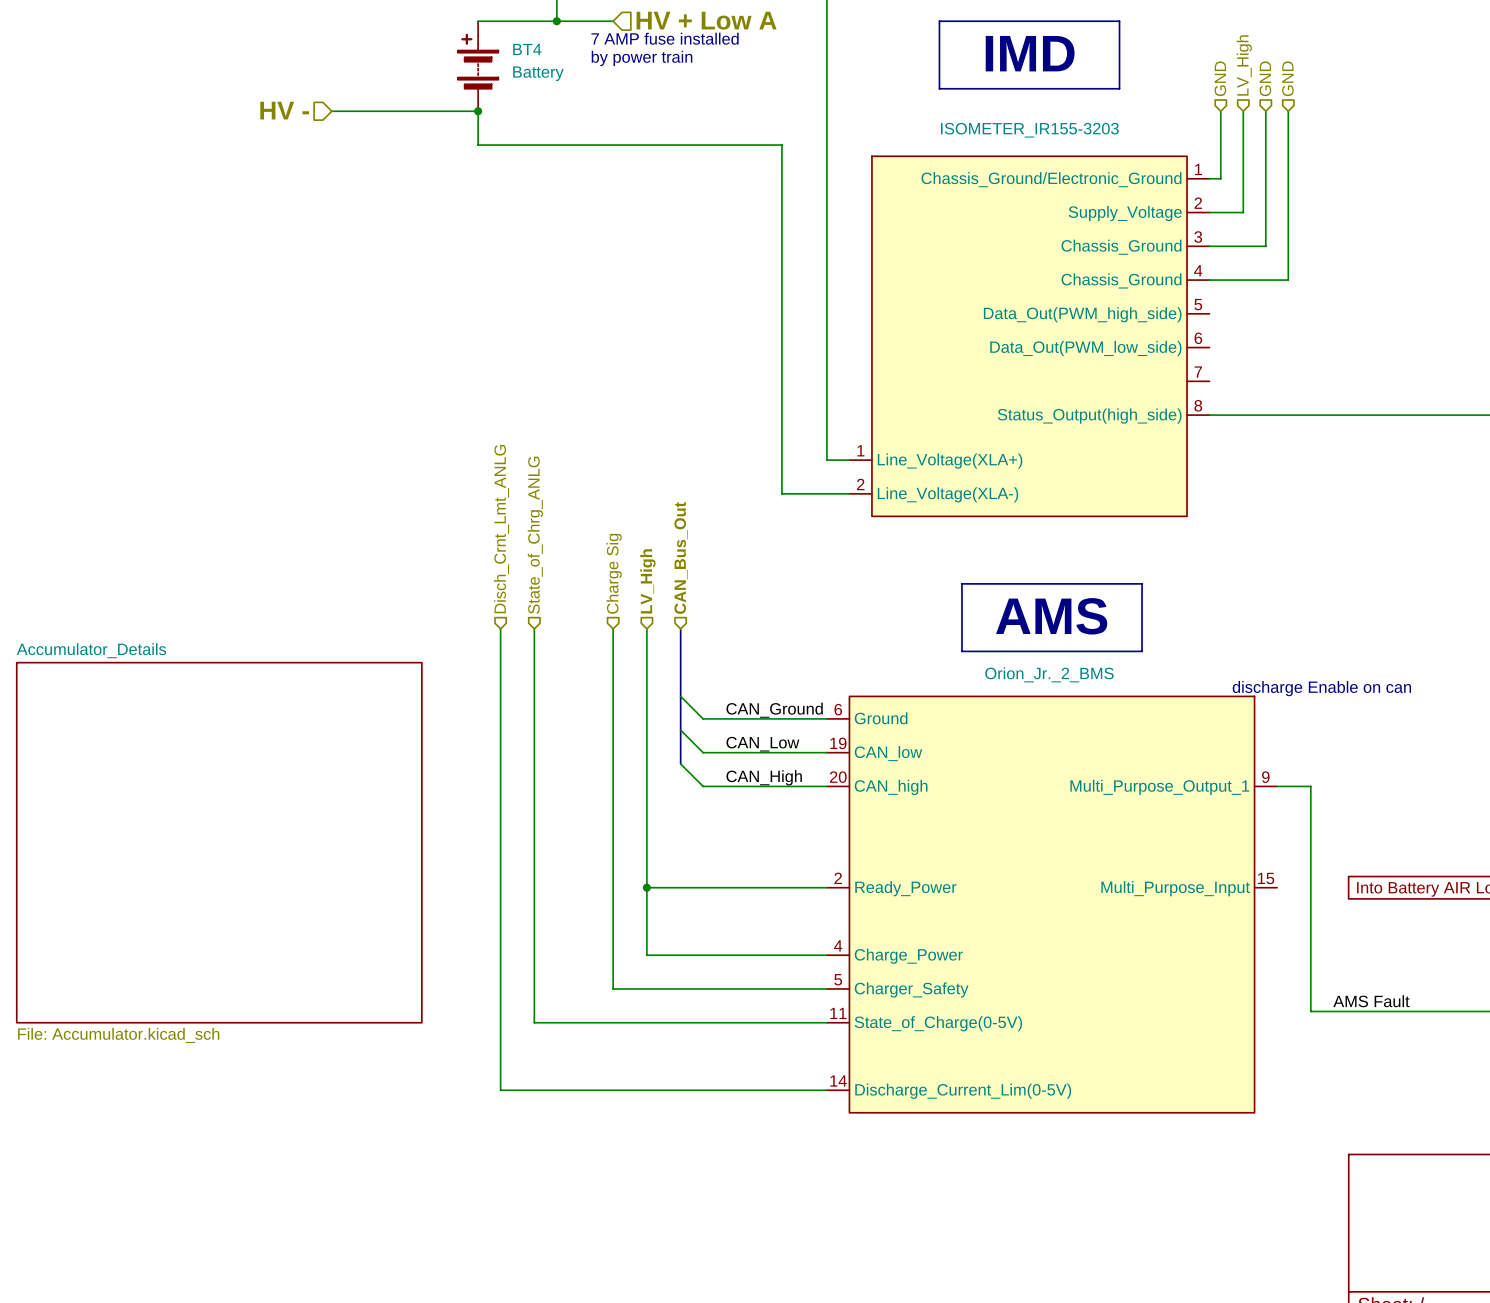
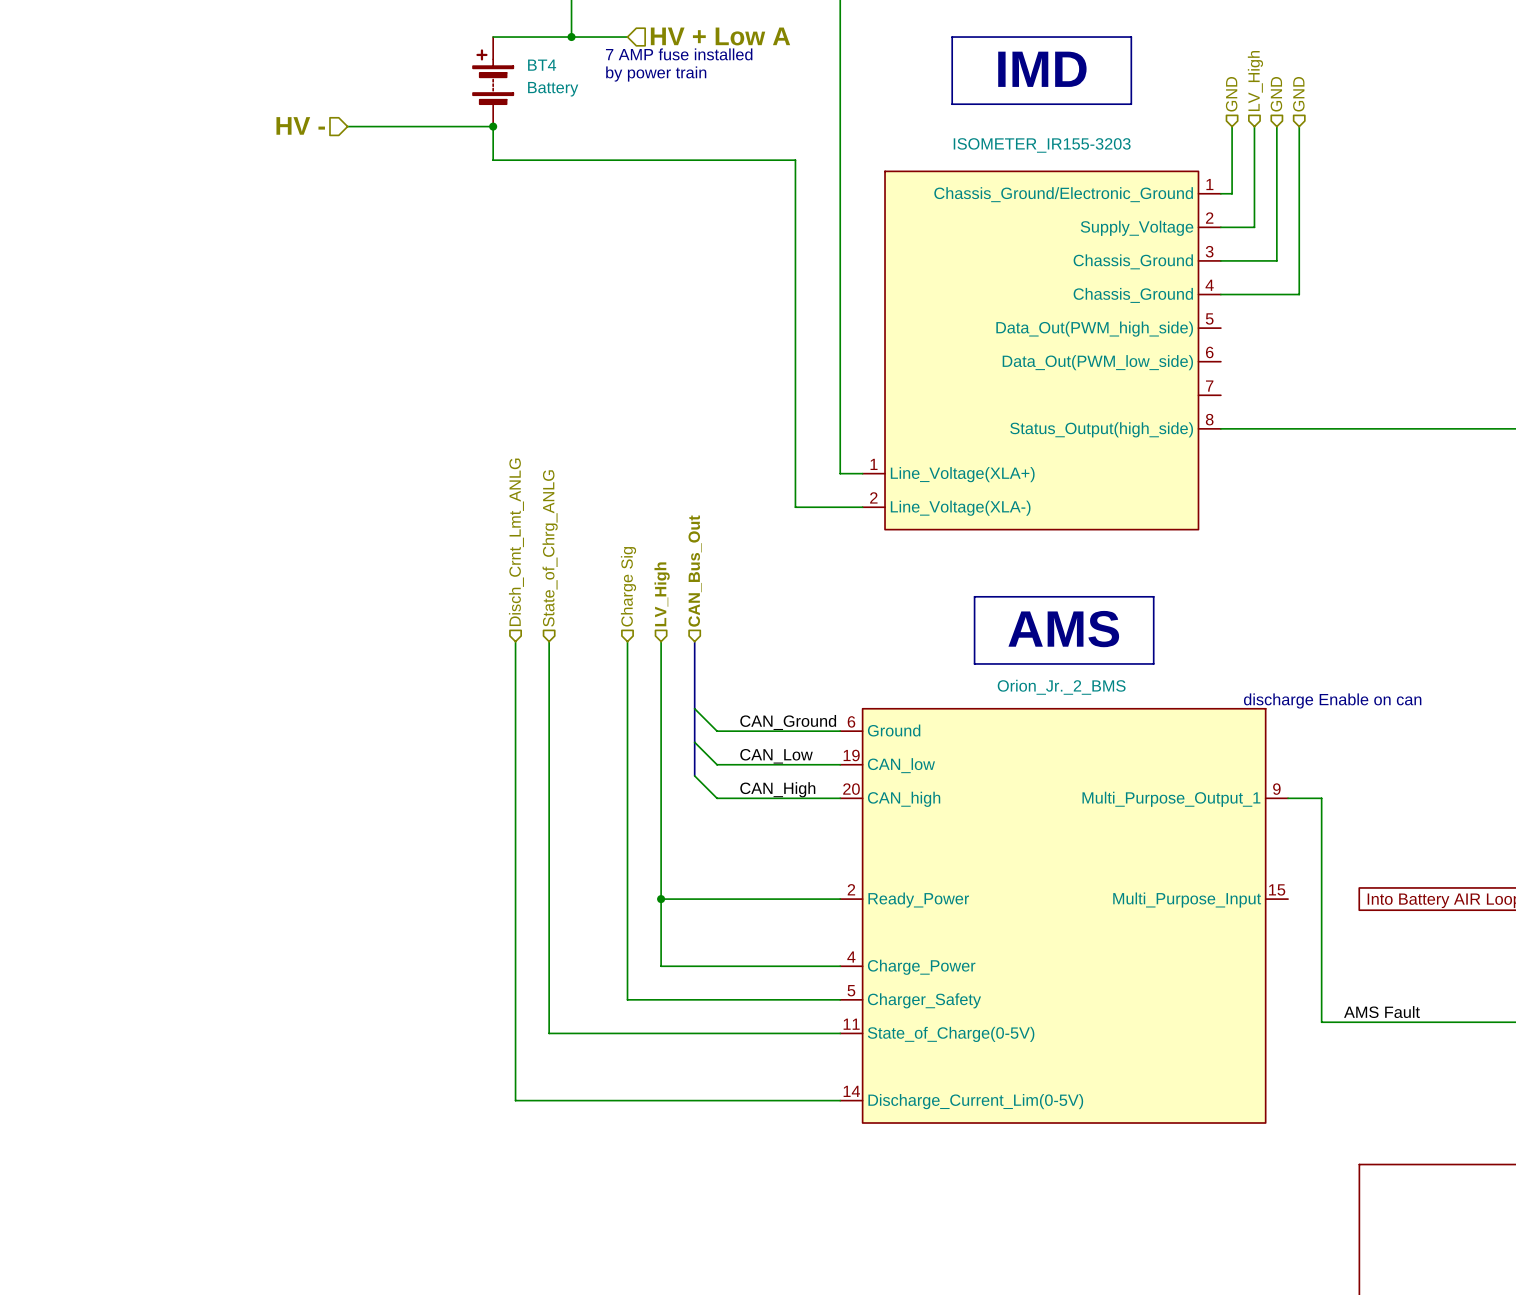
sheet Accumulator_Details: File: Accumulator.kicad_sch (219, 842) -> none

